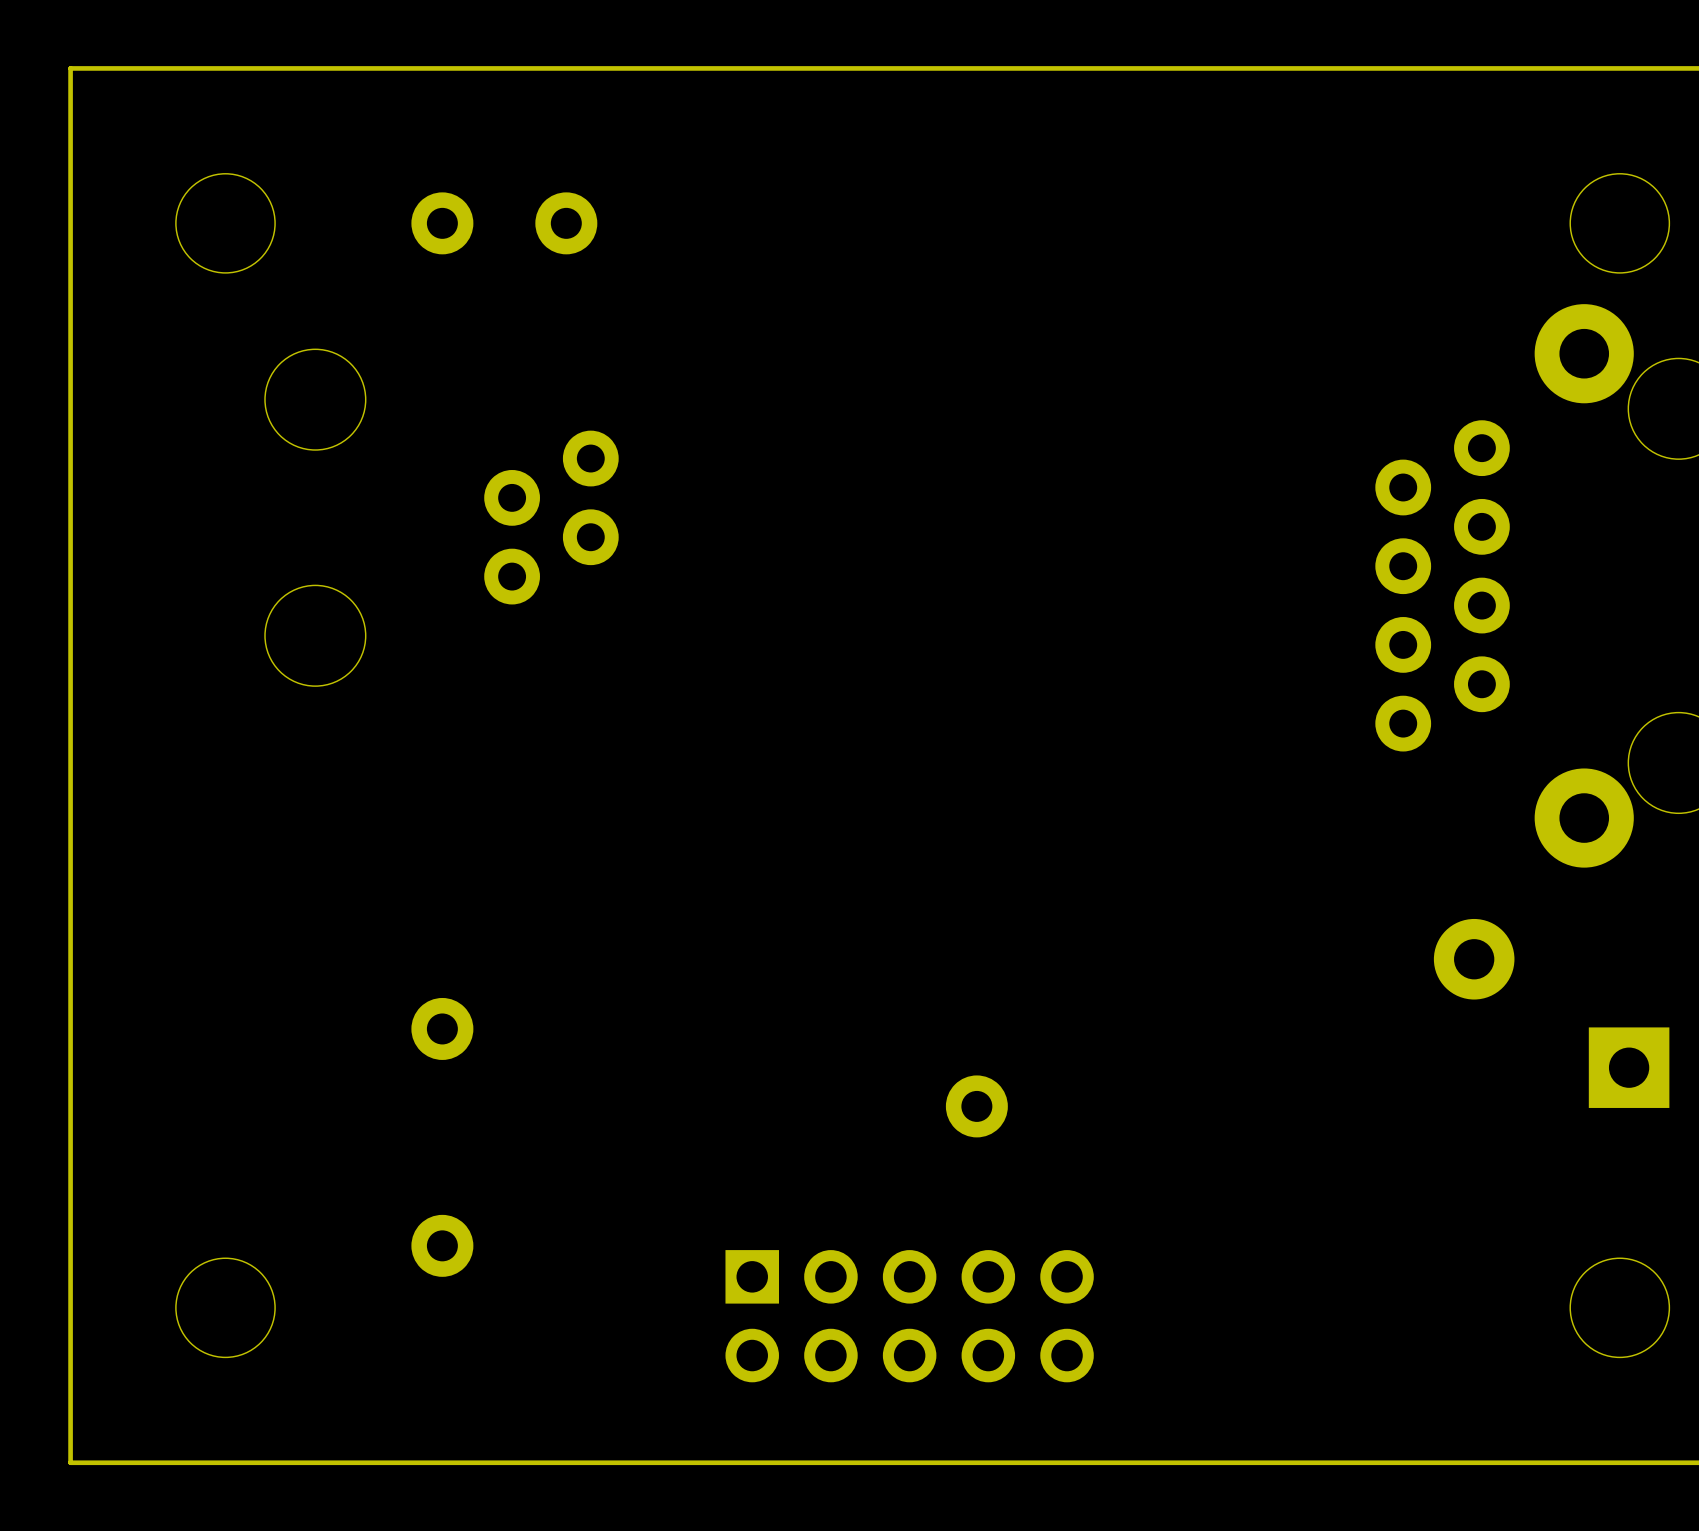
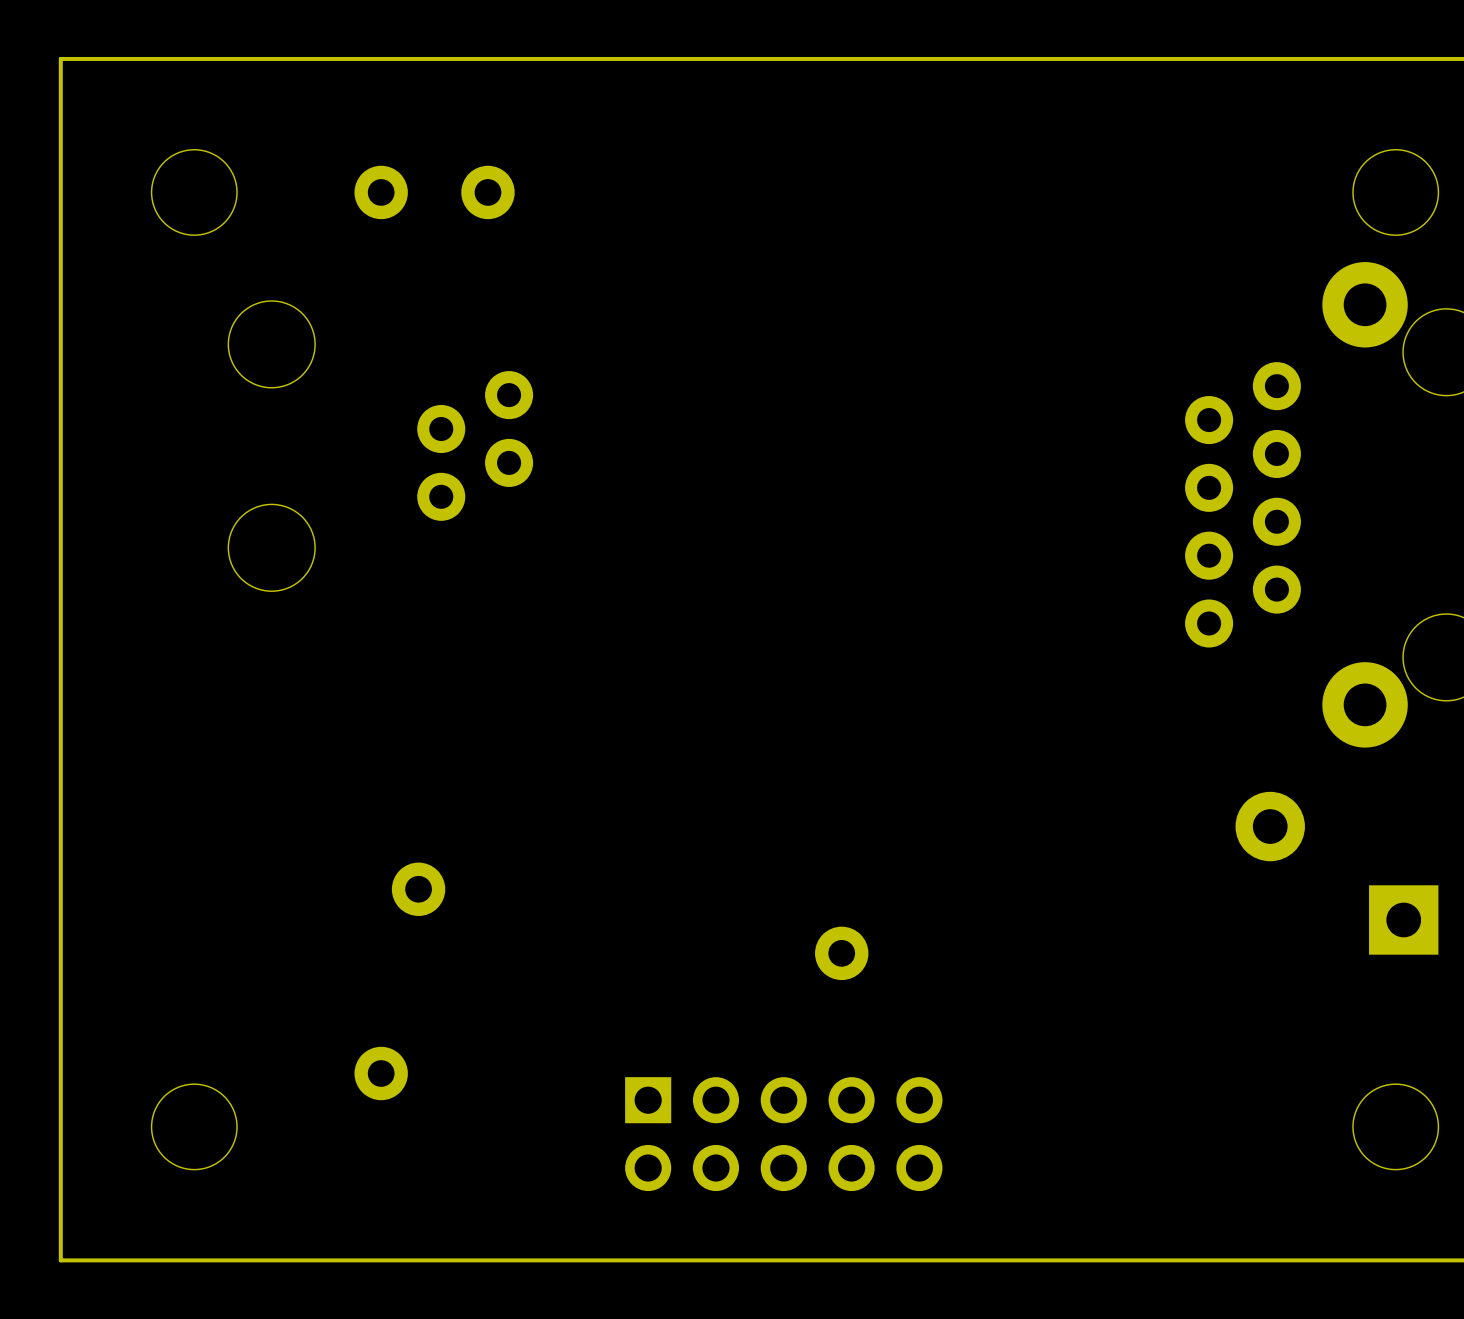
part position: (442, 1028) -> (418, 889)

